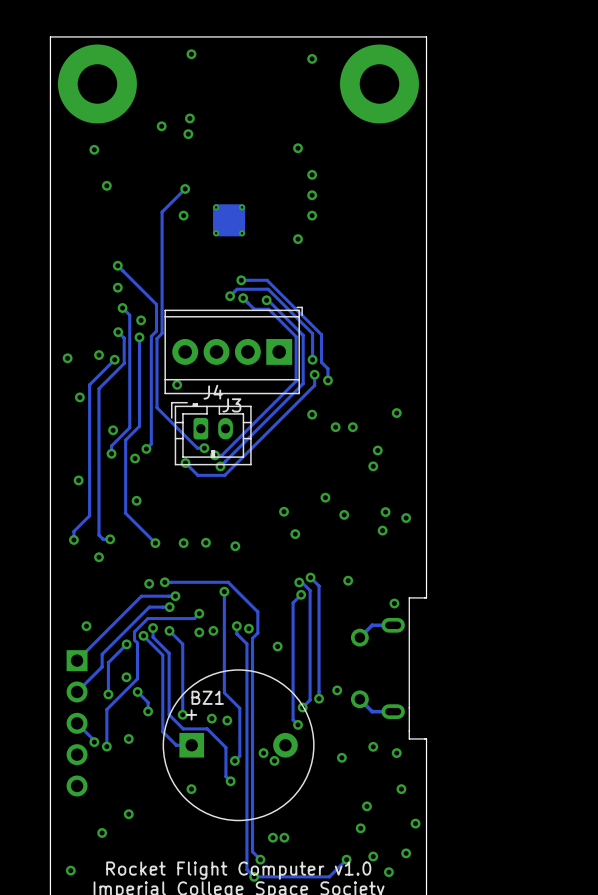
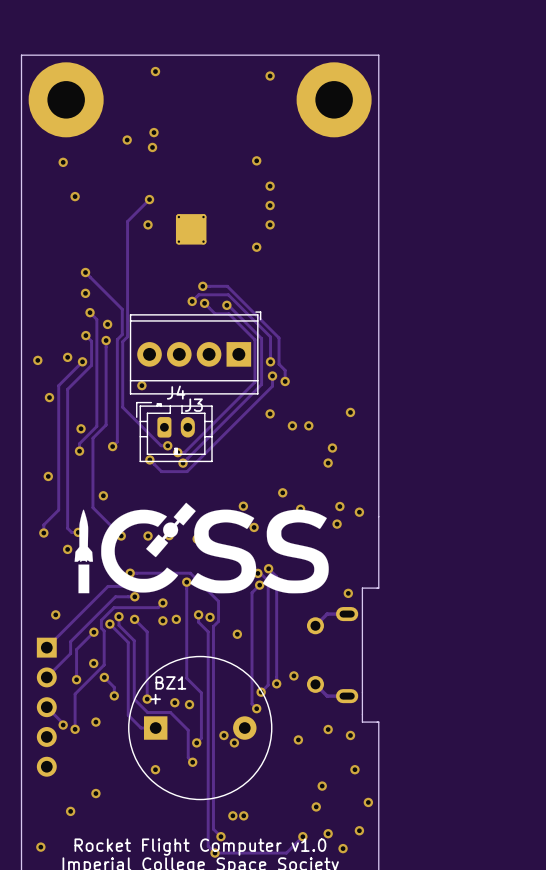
via: (135, 458) -> none
drawing: none -> [74, 502, 329, 594]
via: (348, 580) -> none

